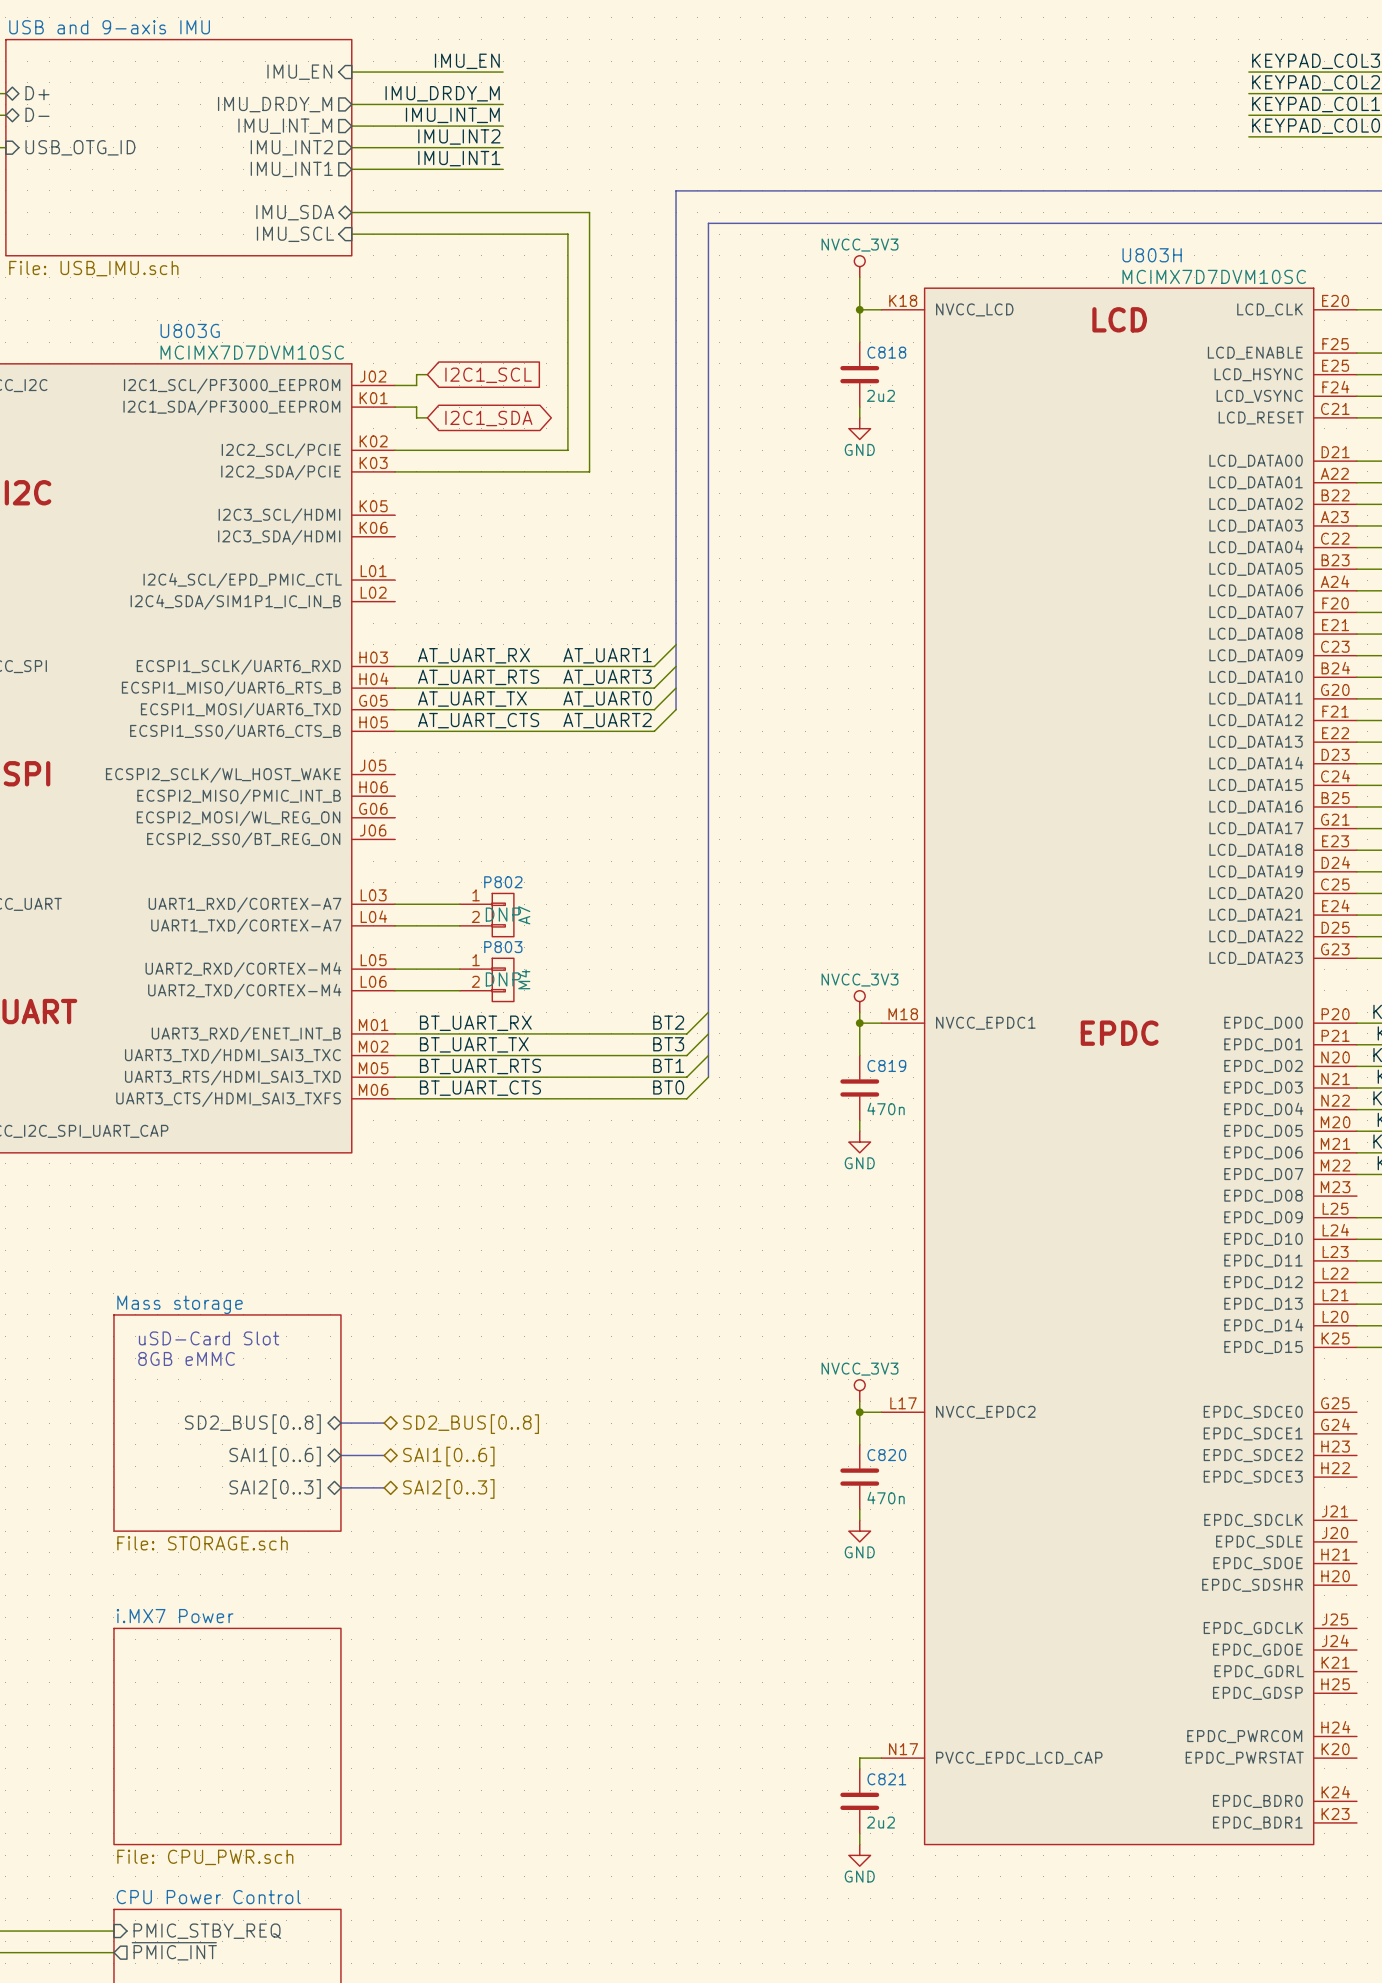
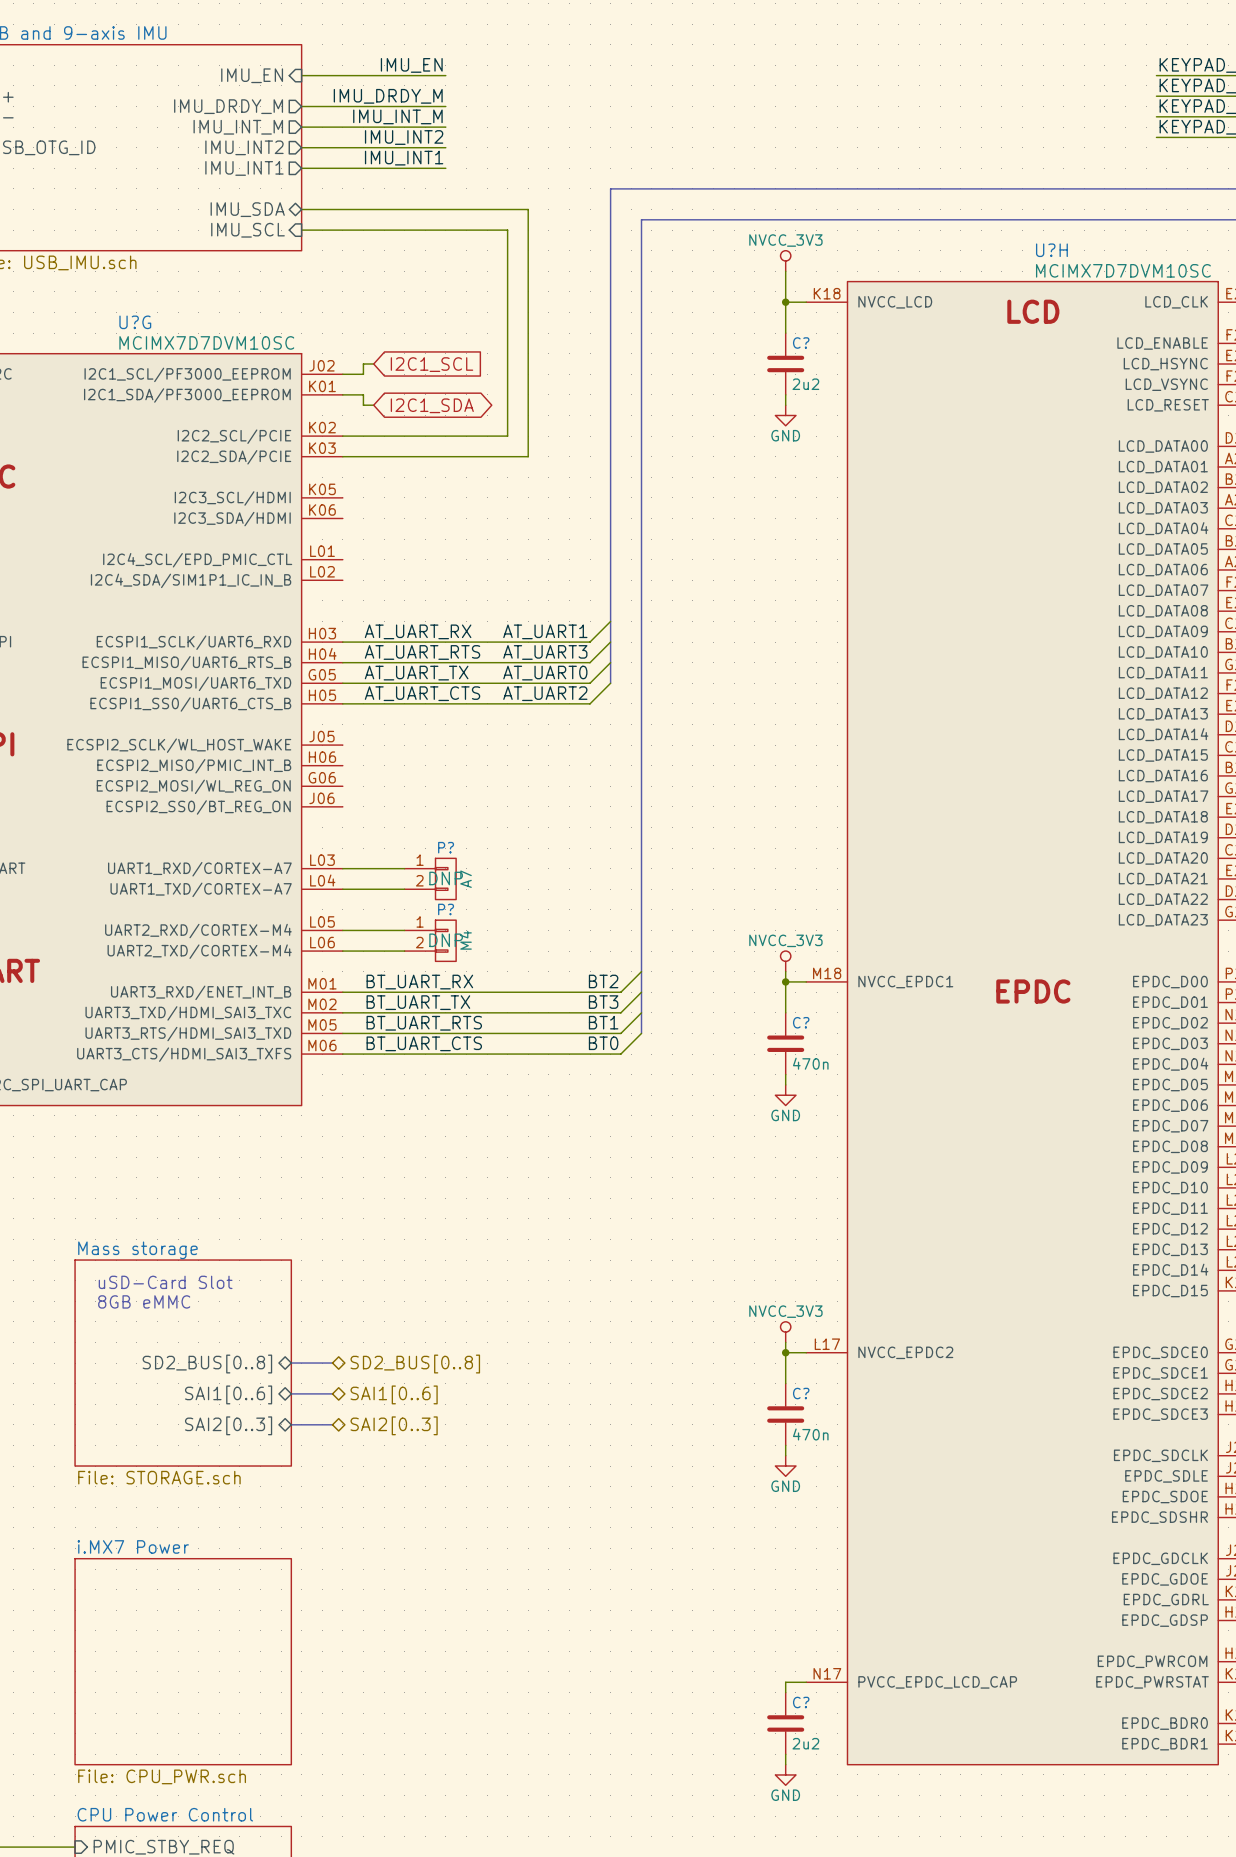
U803H name: U803H (1152, 255) -> U?H (1051, 250)
U803G name: U803G (190, 330) -> U?G (135, 322)
C818 name: C818 (886, 352) -> C? (801, 343)
P802 name: P802 (503, 882) -> P? (446, 847)
P803 name: P803 (503, 947) -> P? (446, 909)
C819 name: C819 (886, 1065) -> C? (801, 1022)
C820 name: C820 (886, 1455) -> C? (801, 1393)
C821 name: C821 (886, 1779) -> C? (801, 1702)

